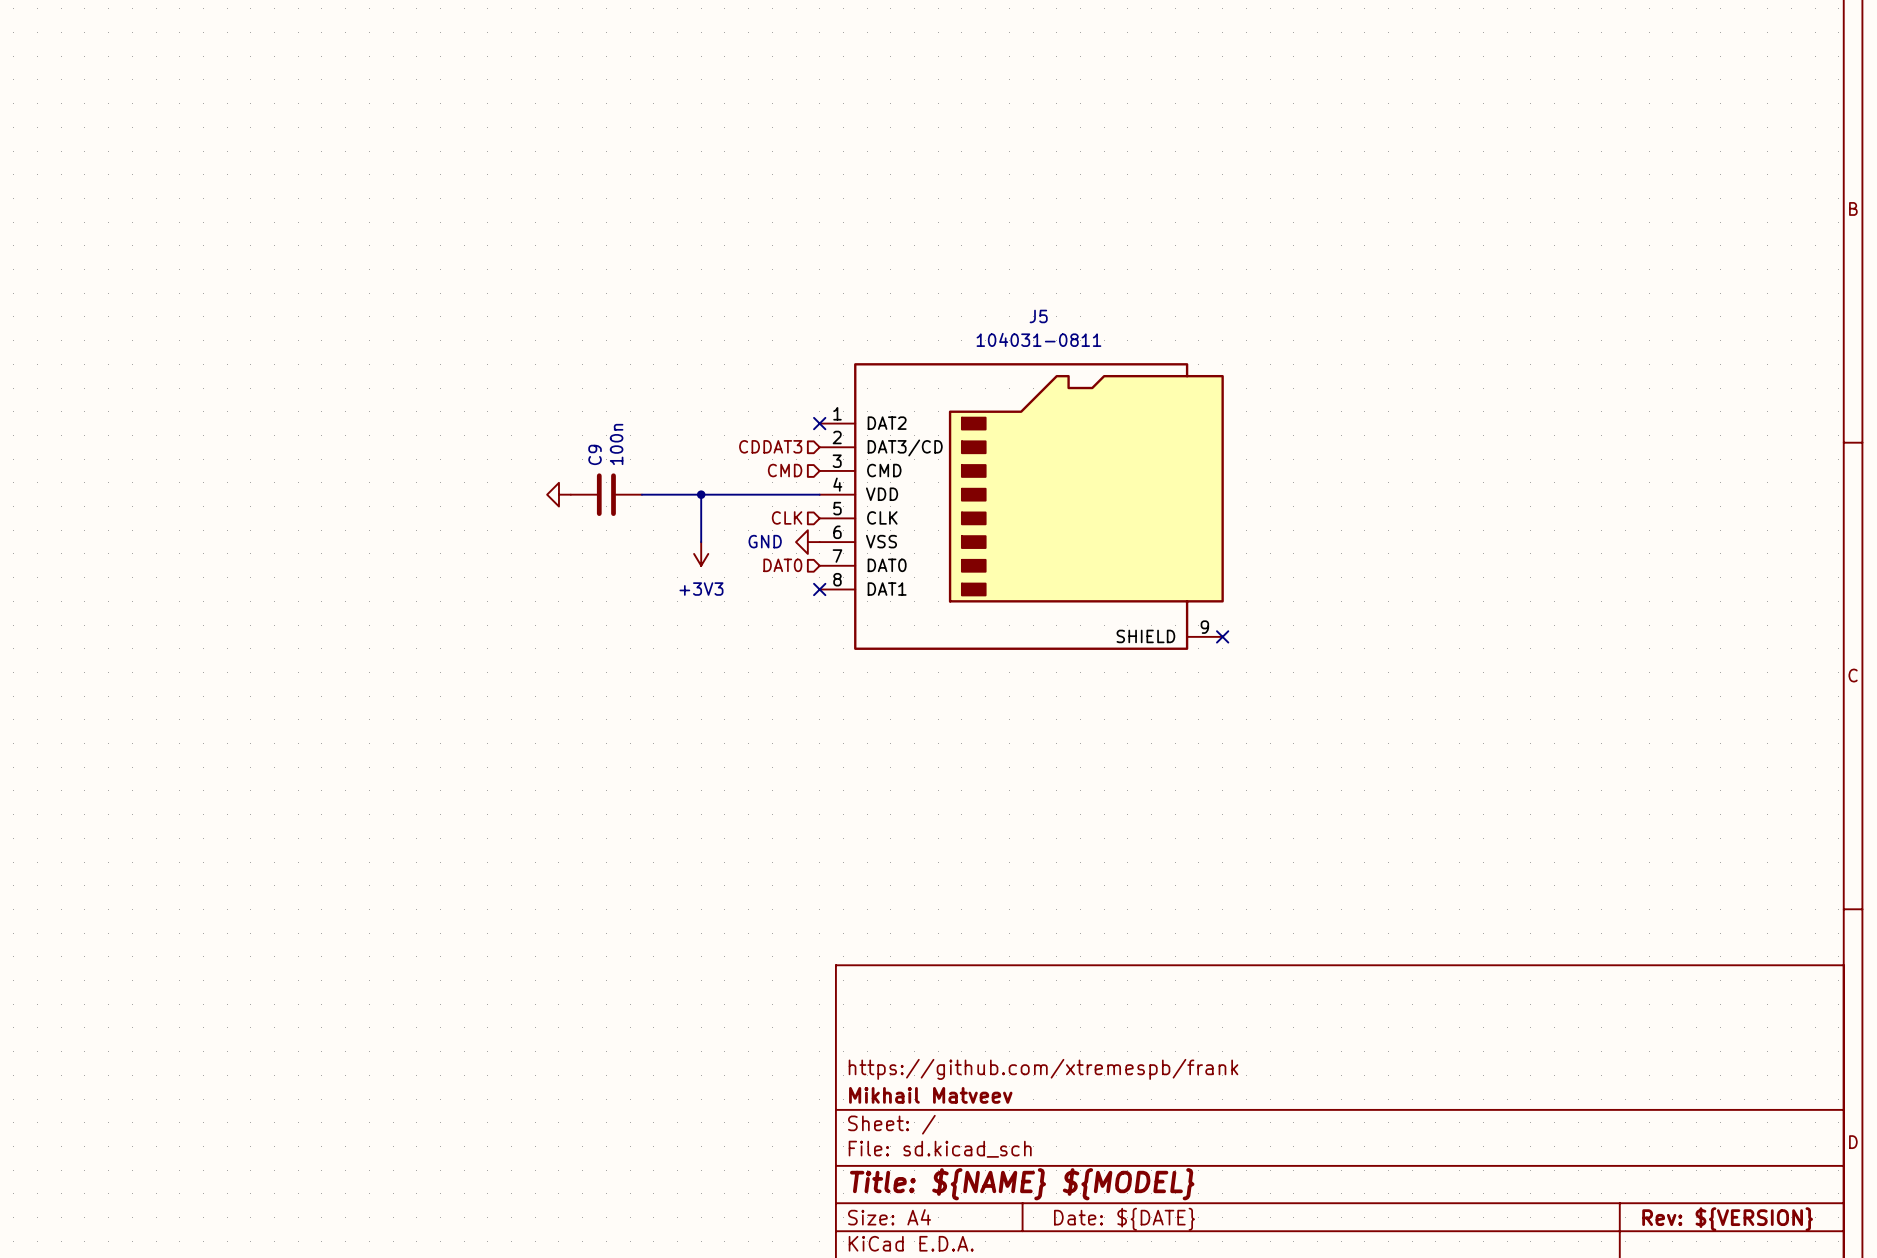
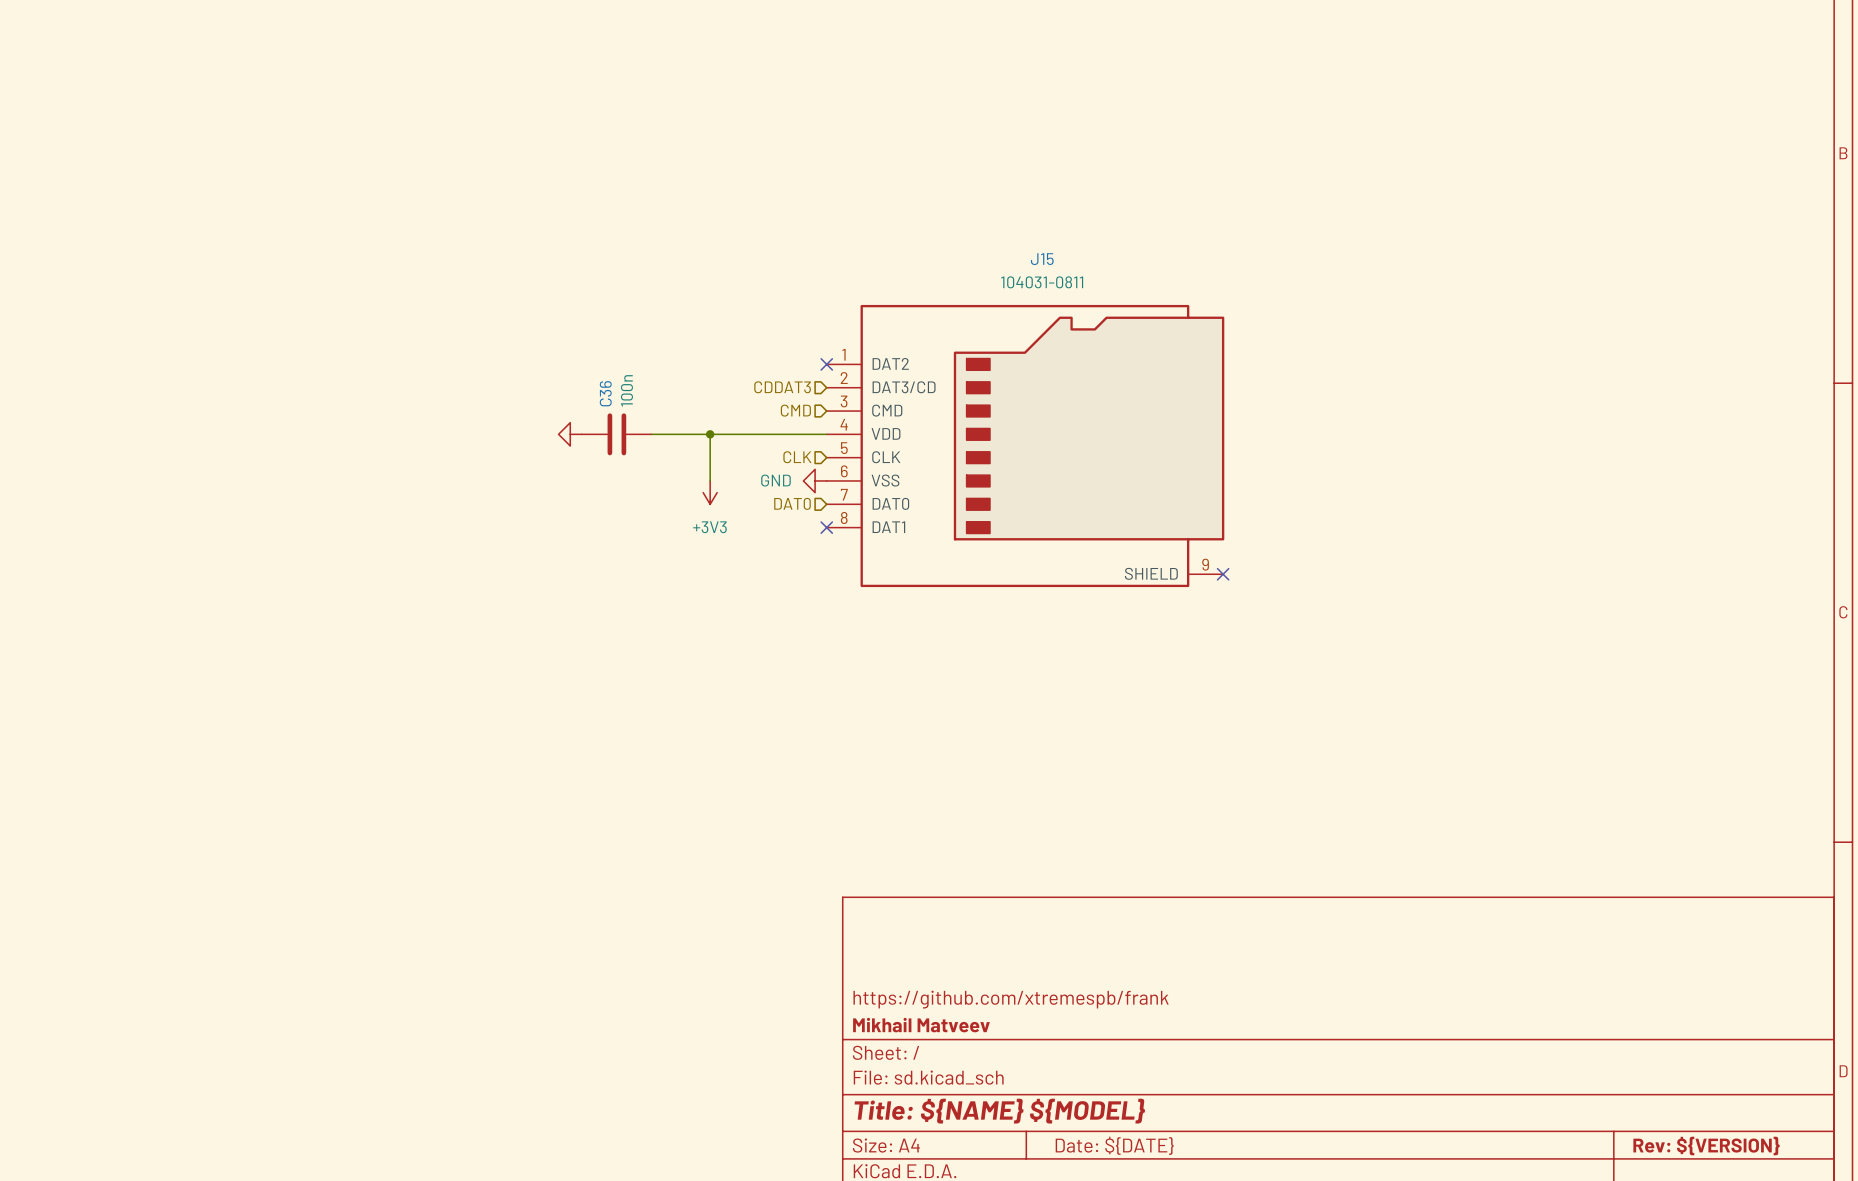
J5 name: J5 (1038, 316) -> J15 (1042, 259)
C9 name: C9 (595, 454) -> C36 (605, 393)

